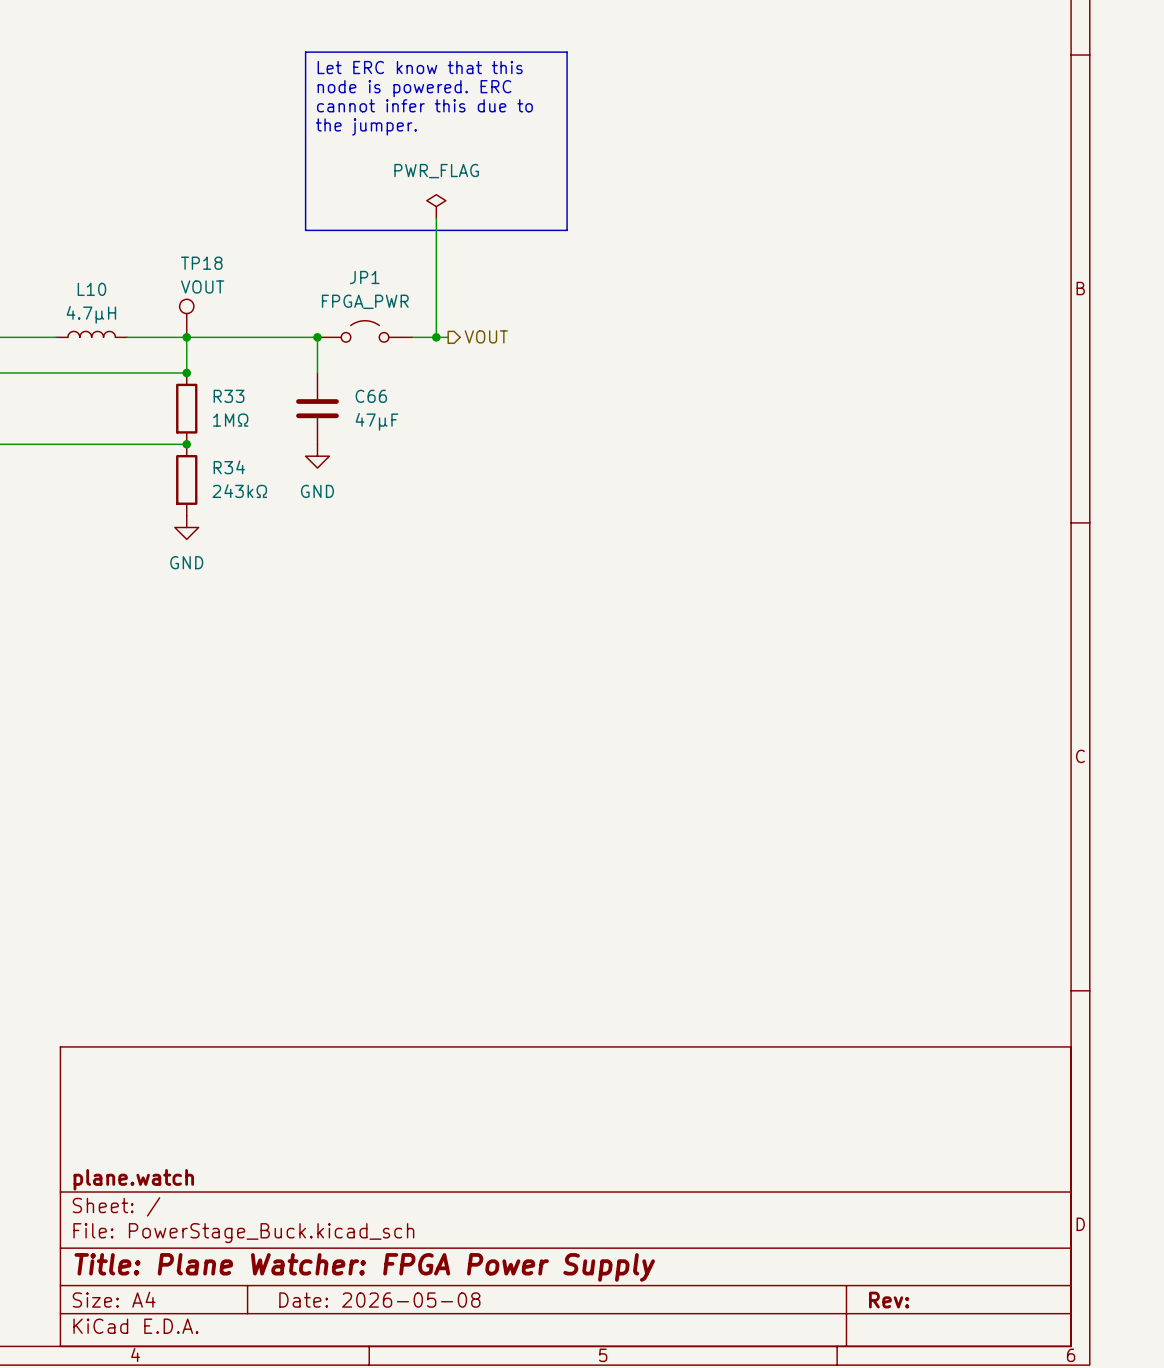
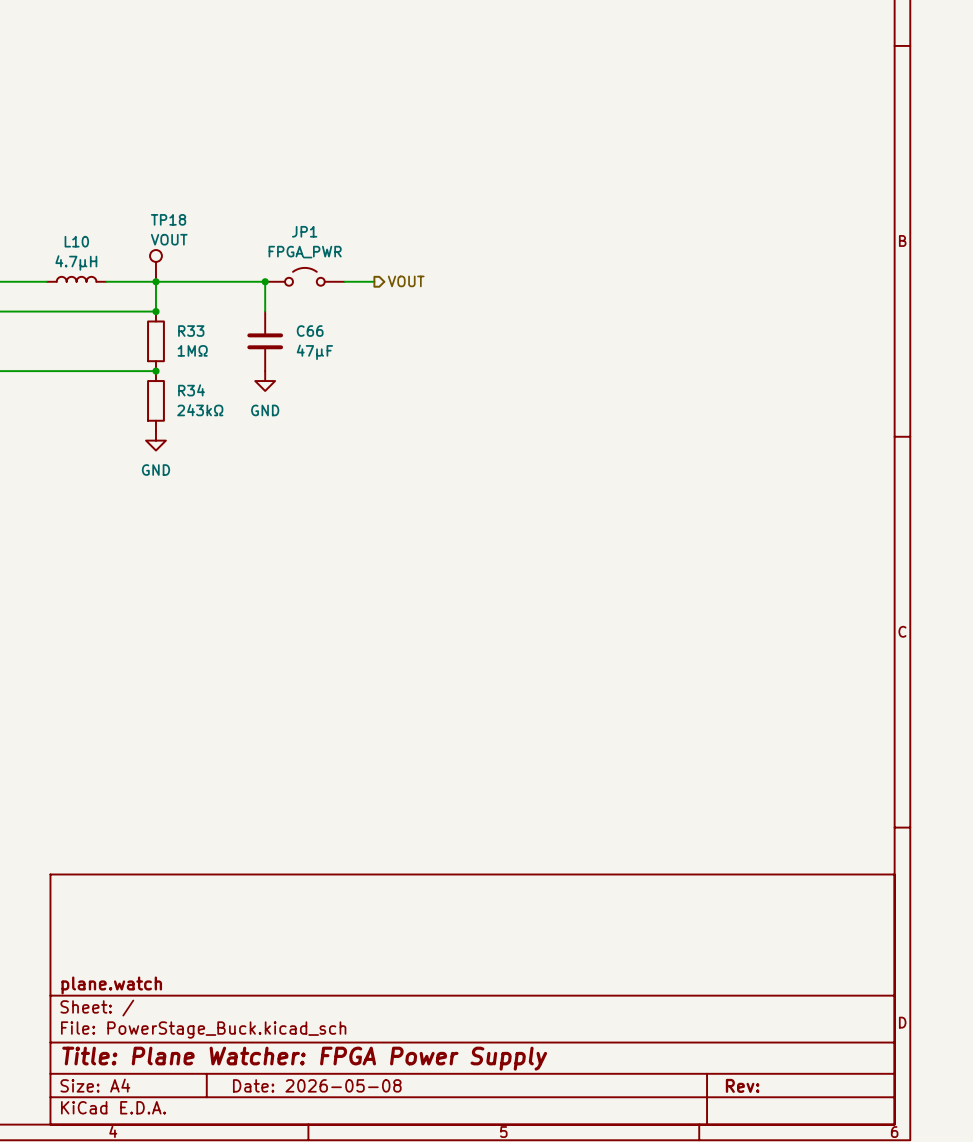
line: (305, 52) (567, 52) (567, 230) (305, 230) (305, 52) -> none
text: Let ERC know that this (420, 67) -> none
text: node is powered. ERC (414, 88) -> none
text: cannot infer this due to (424, 105) -> none
text: the jumper. (366, 126) -> none
power symbol: PWR_FLAG (436, 206) -> none
wire: (436, 218) (436, 337) -> none
junction: (436, 337) -> none

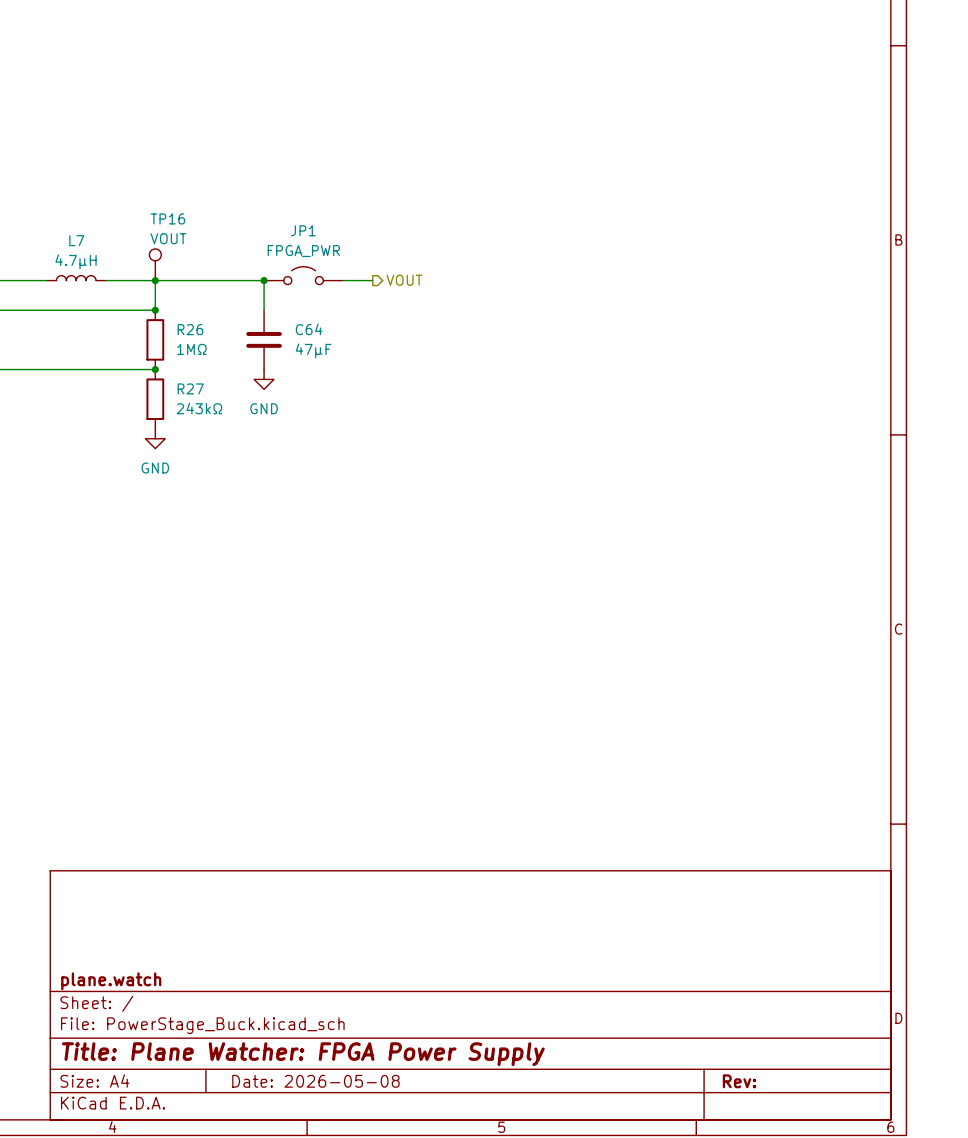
TP18 name: TP18 (168, 219) -> TP16 (167, 218)
L10 name: L10 (76, 241) -> L7 (76, 240)
R33 name: R33 (191, 331) -> R26 (190, 329)
C66 name: C66 (310, 331) -> C64 (309, 329)
R34 name: R34 (191, 390) -> R27 (190, 388)

